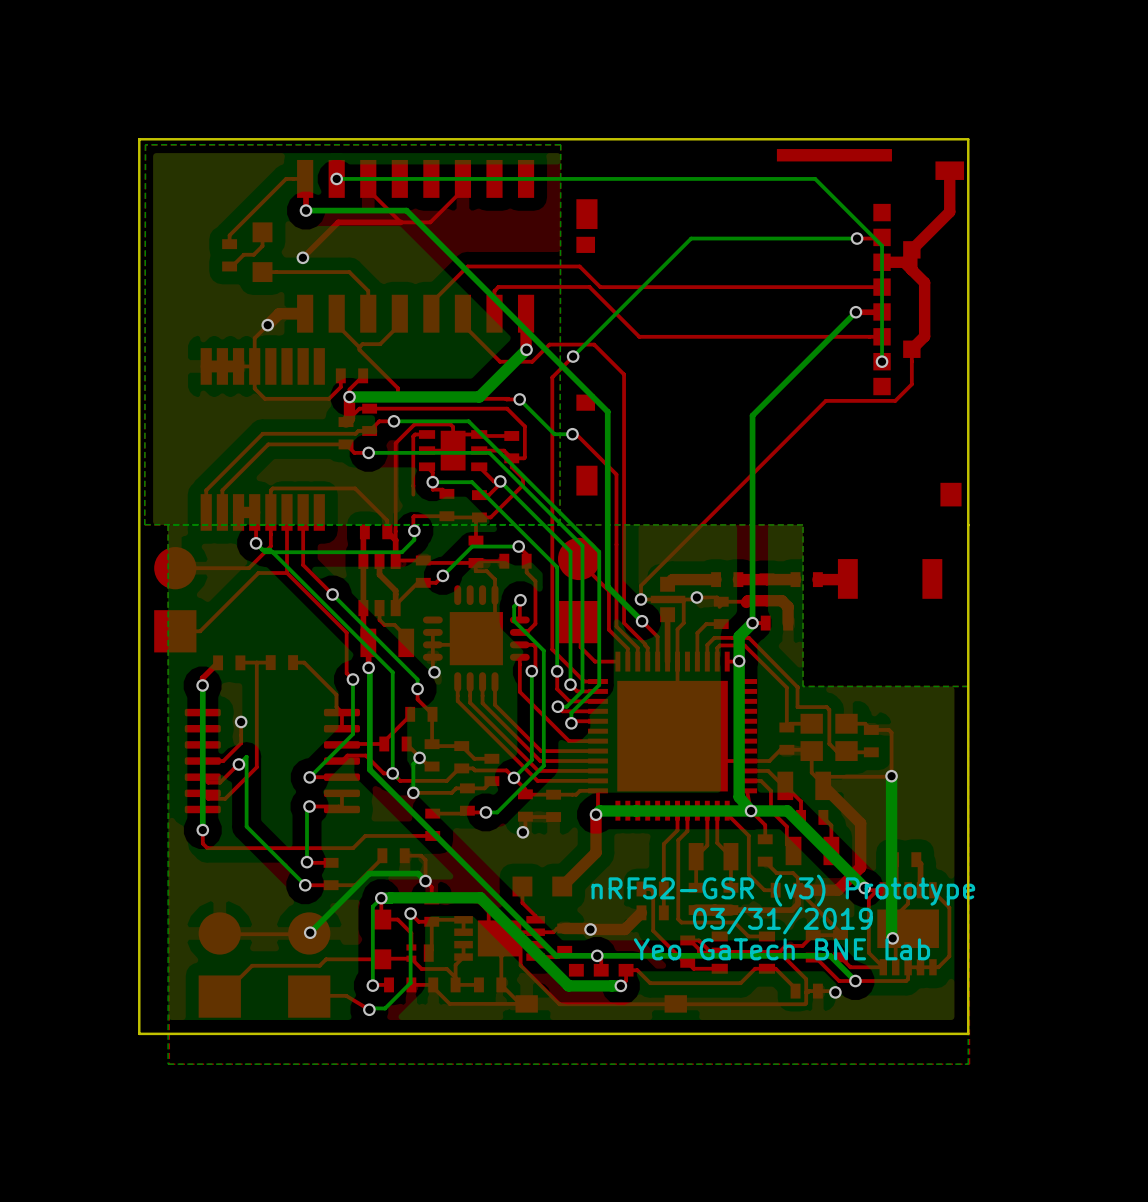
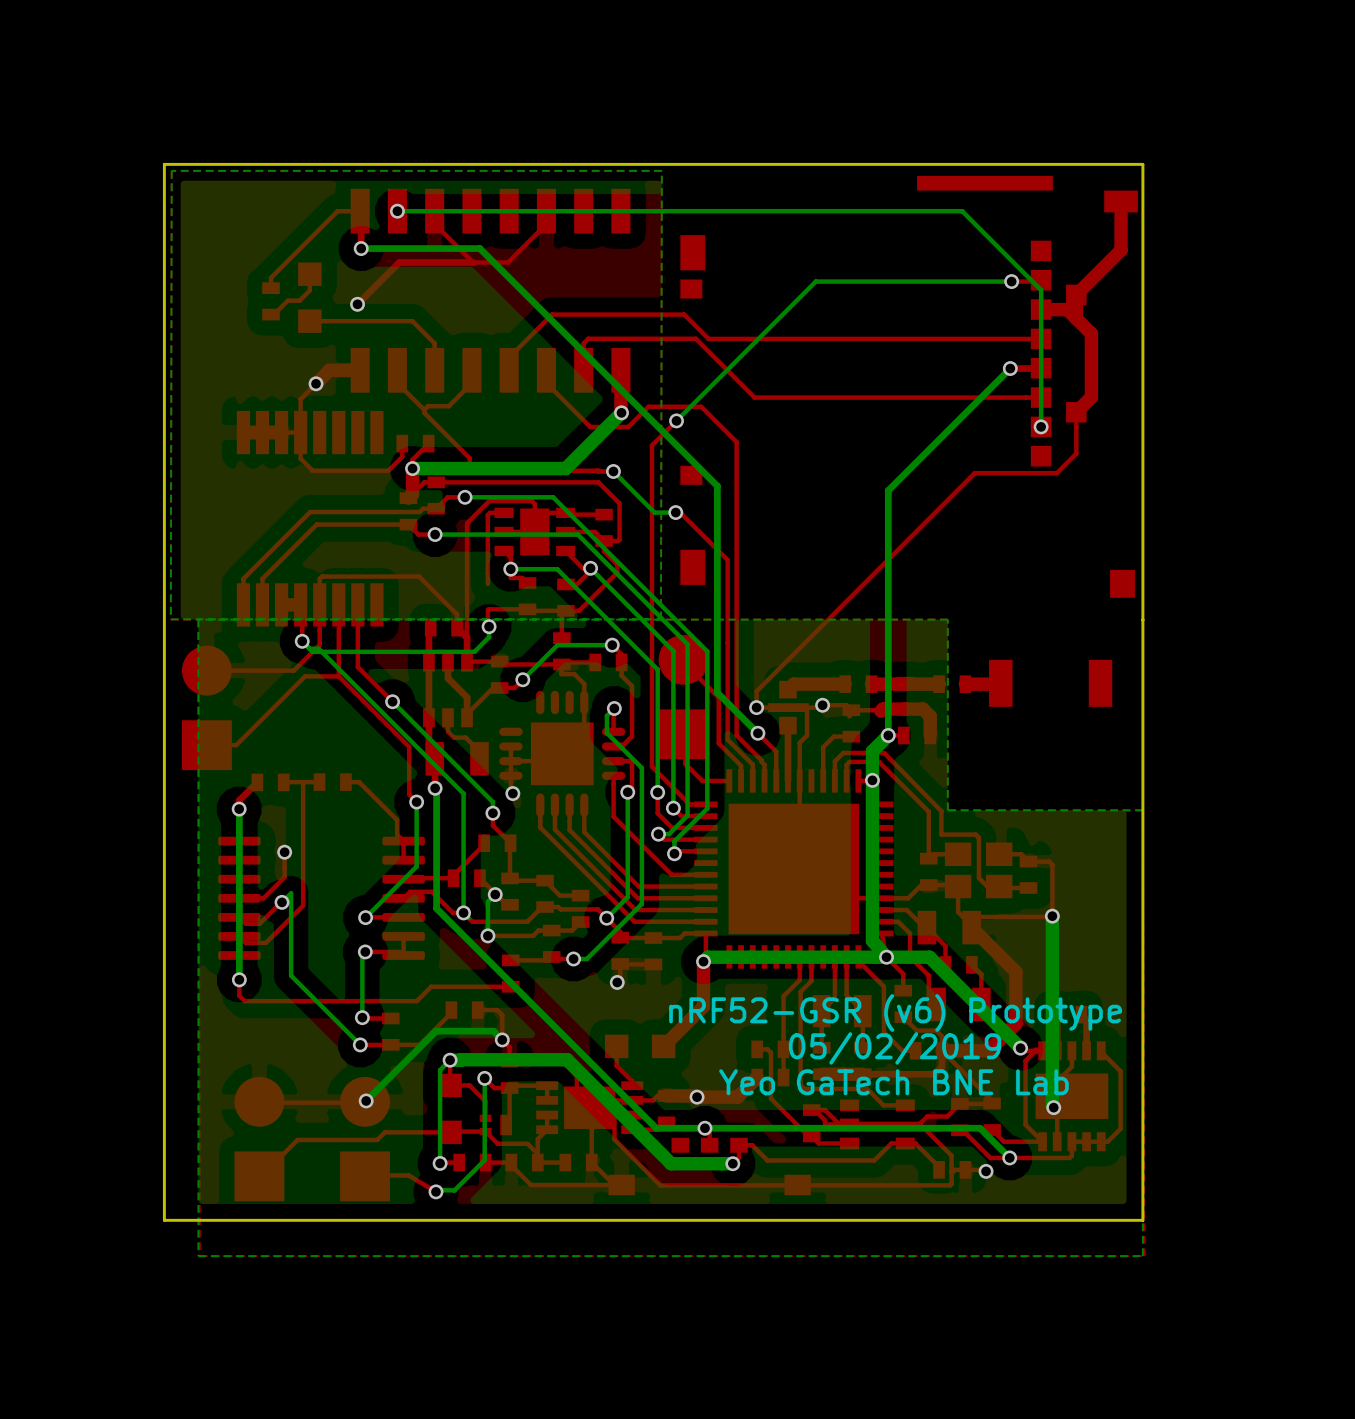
text: nRF52-GSR (v3) Prototype (783, 890) -> nRF52-GSR (v6) Prototype (895, 1012)
text: 03/31/2019 (782, 920) -> 05/02/2019 (895, 1048)
text position: Yeo GaTech BNE Lab (781, 949) -> Yeo GaTech BNE Lab (893, 1082)

